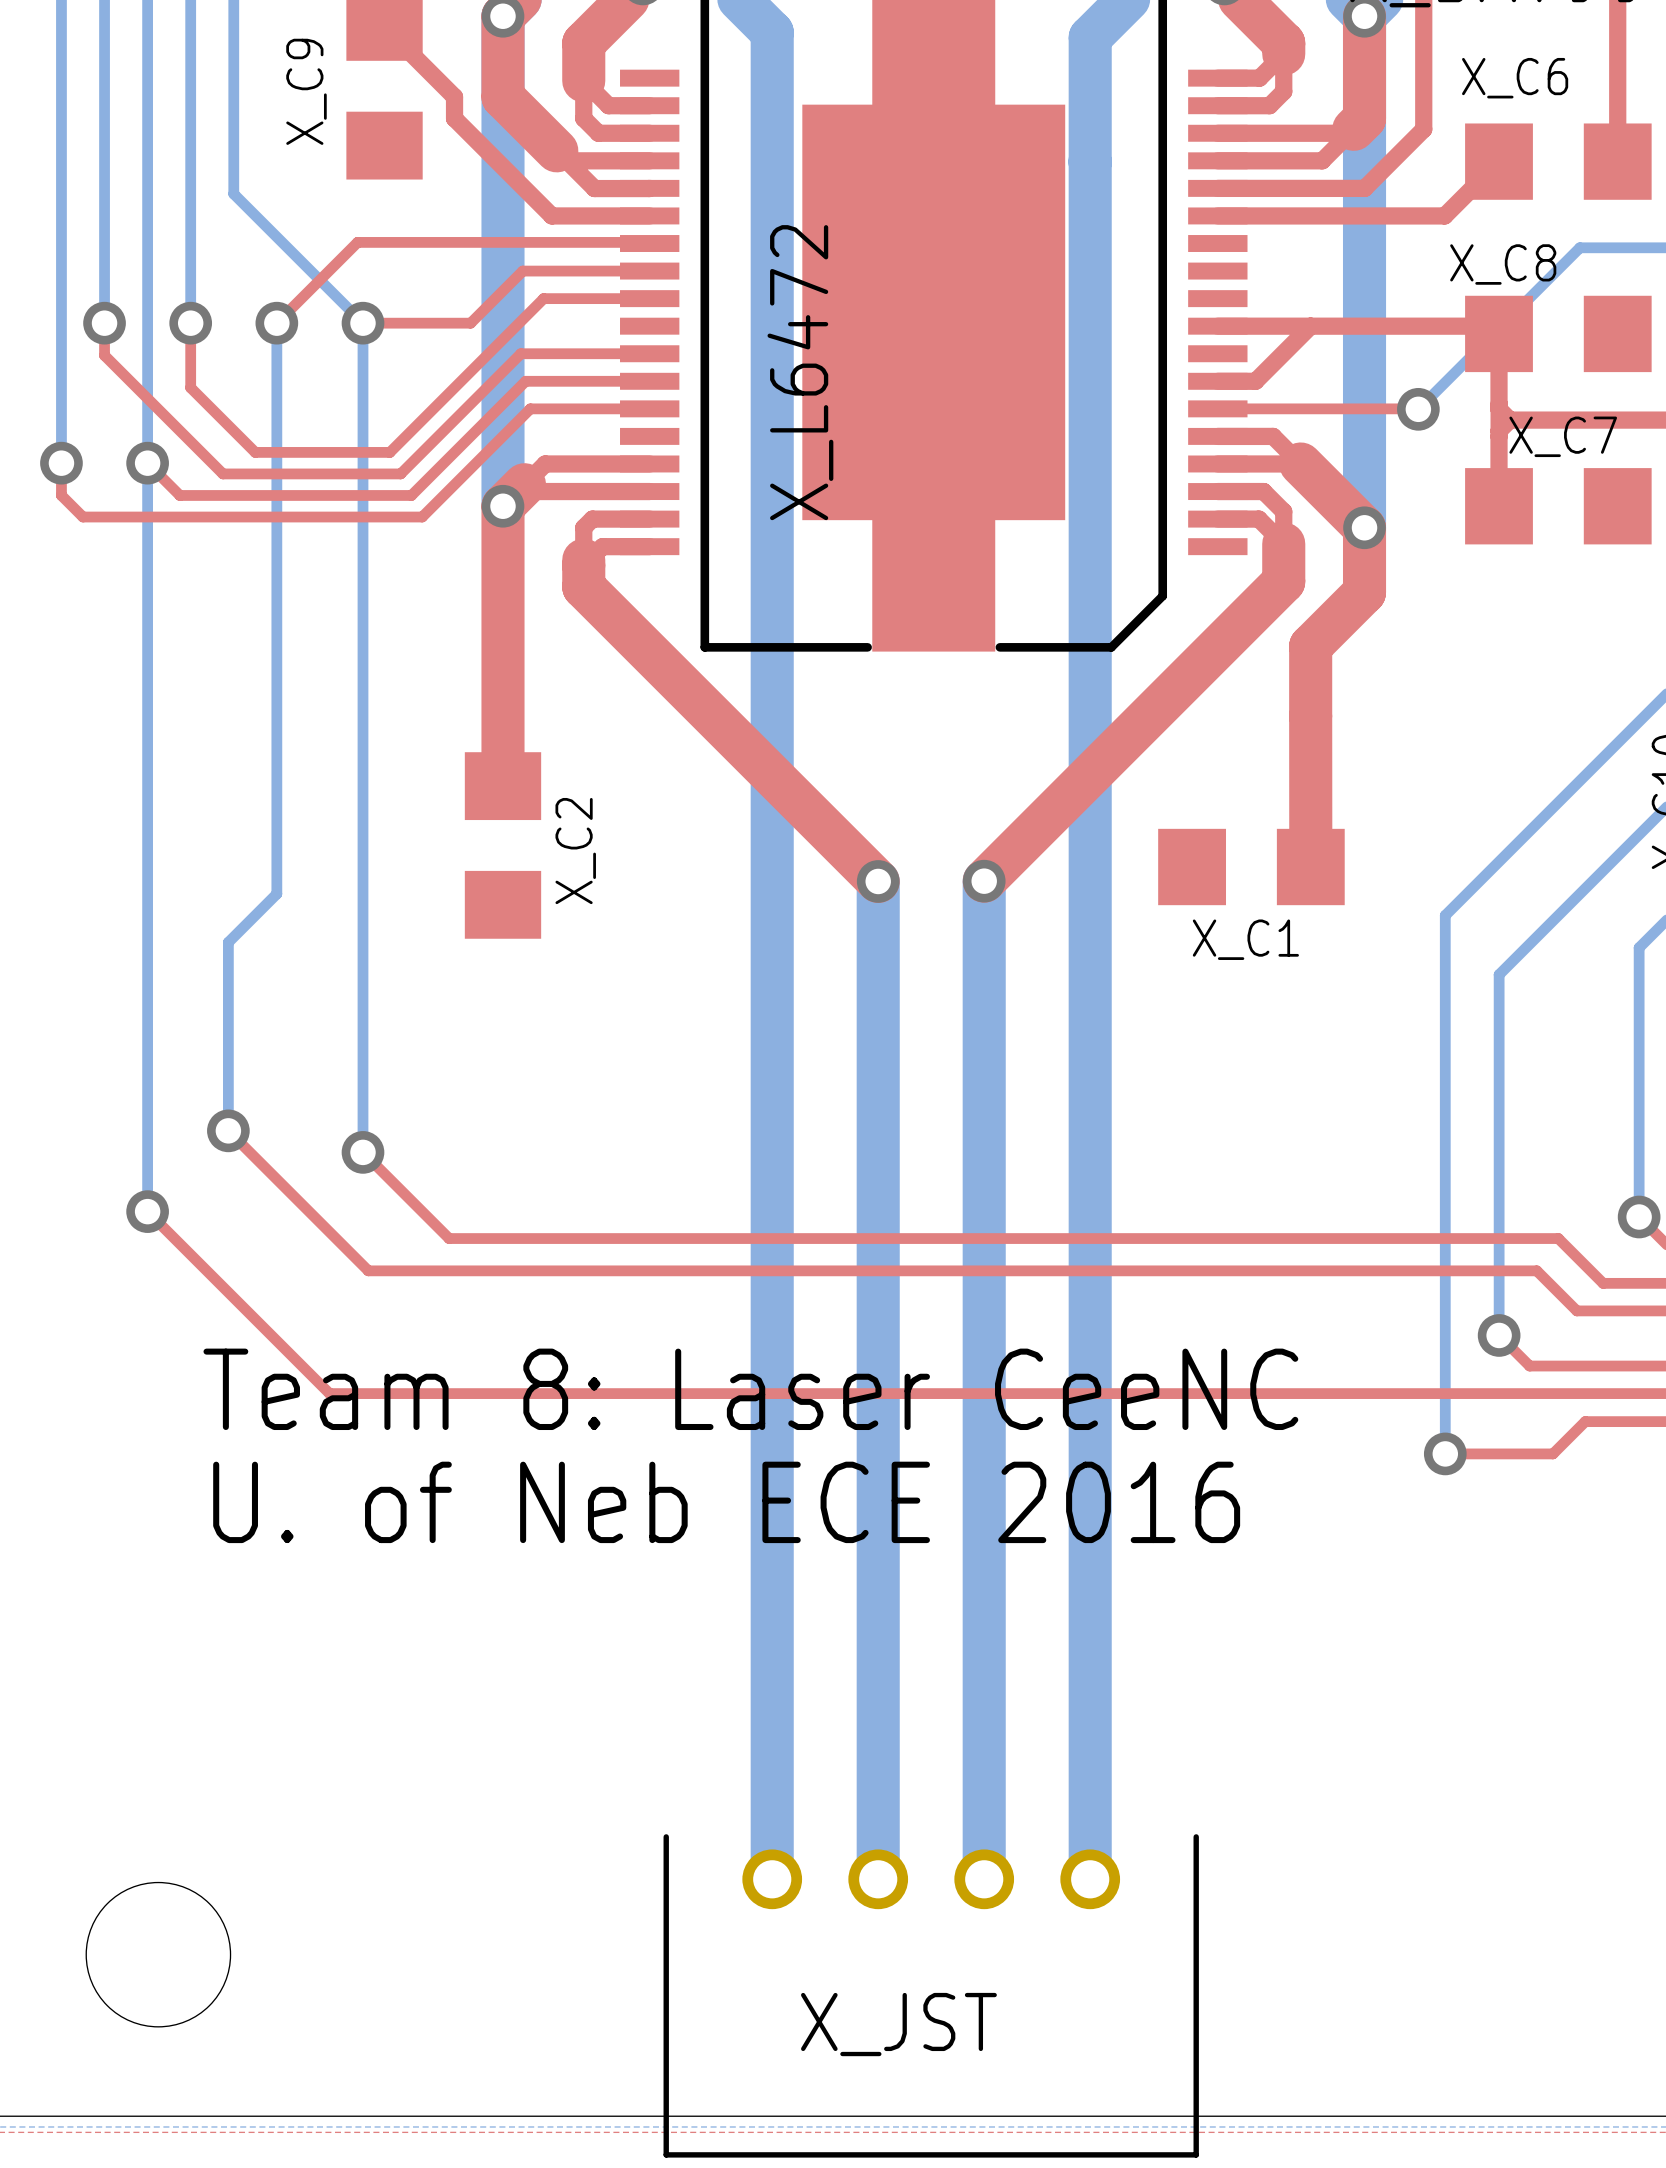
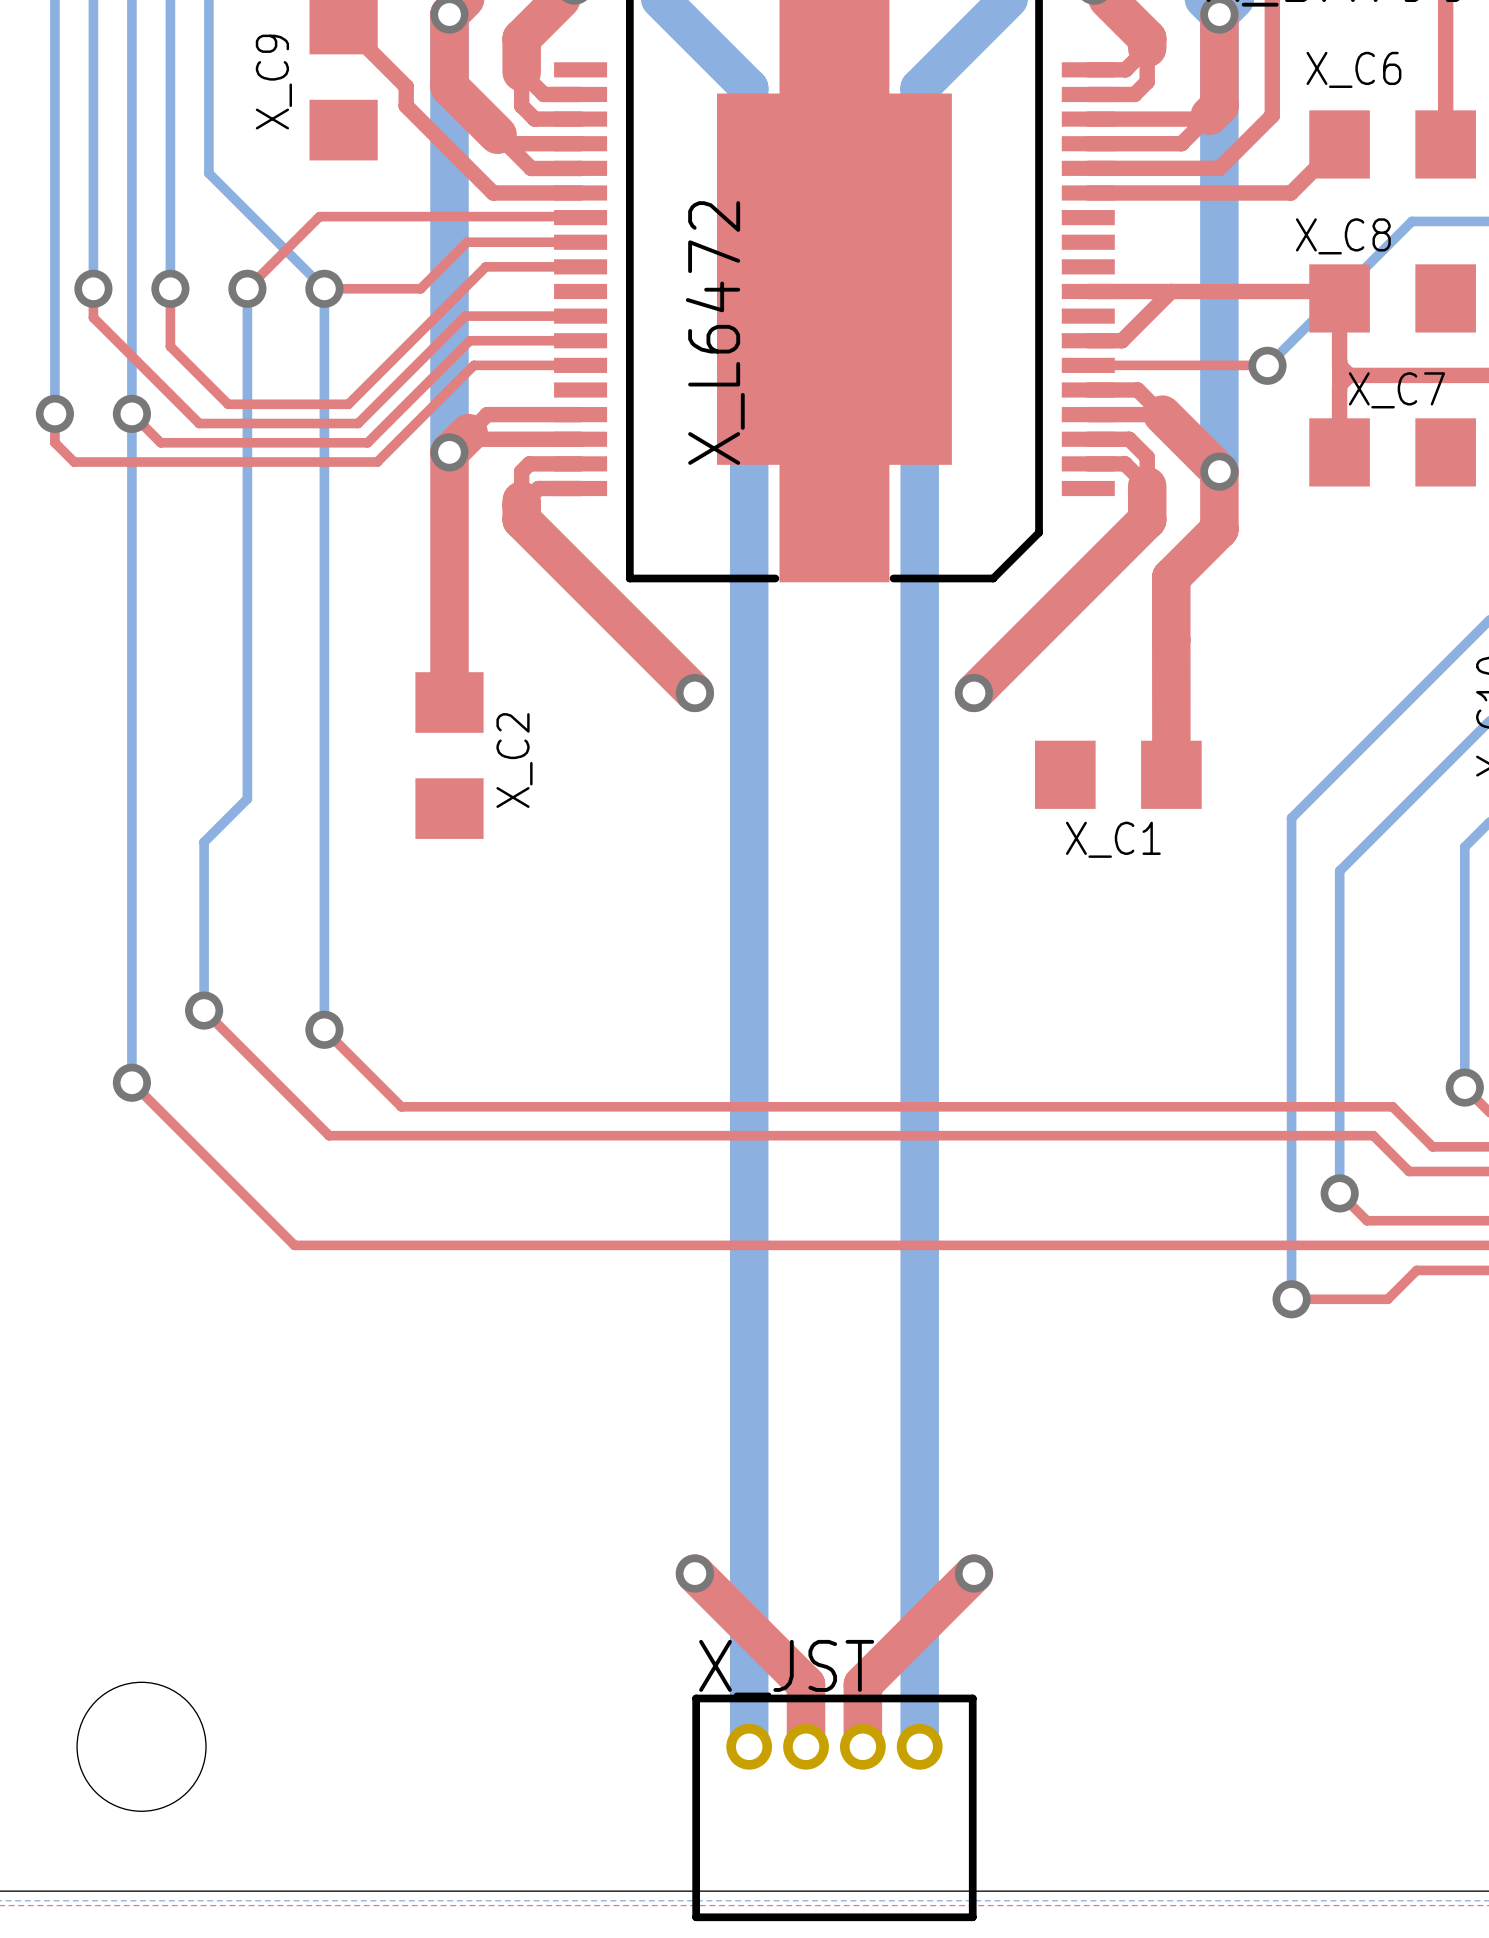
bottom track: (772, 32) (772, 1879) -> (690, 28) (749, 88) (749, 1746)
bottom track: (1090, 37) (1090, 1879) -> (974, 33) (919, 88) (919, 1746)
top track: (583, 581) (583, 587) (878, 881) -> (521, 519) (694, 692)
via: none -> (694, 692)
top track: (1089, 775) (984, 881) -> none
via: none -> (973, 692)
bottom track: (878, 881) (878, 1879) -> none
via: (878, 881) -> none
bottom track: (984, 881) (984, 1879) -> none
via: (984, 881) -> none
text: Team 8: Laser CeeNC (750, 1389) -> none
text: U. of Neb ECE 2016 (726, 1502) -> none
top track: none -> (694, 1573) (806, 1684) (806, 1746)
via: none -> (694, 1573)
top track: none -> (973, 1573) (862, 1684) (862, 1746)
via: none -> (973, 1573)
X_JST footprint: [663, 1834, 1199, 2158] -> [692, 1694, 977, 1922]
X_JST name position: X_JST (898, 2024) -> X_JST (786, 1668)

